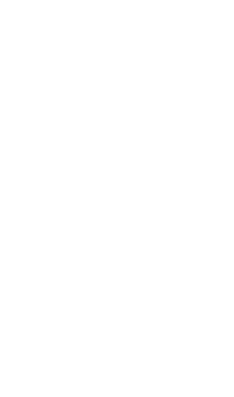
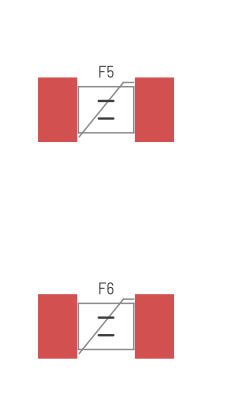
F5: none -> (106, 109)
F6: none -> (106, 326)

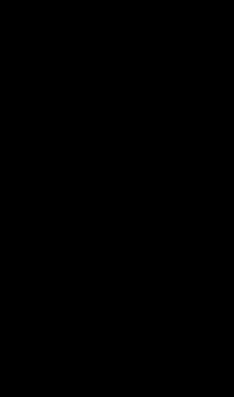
F5: (106, 109) -> none
F6: (106, 326) -> none

